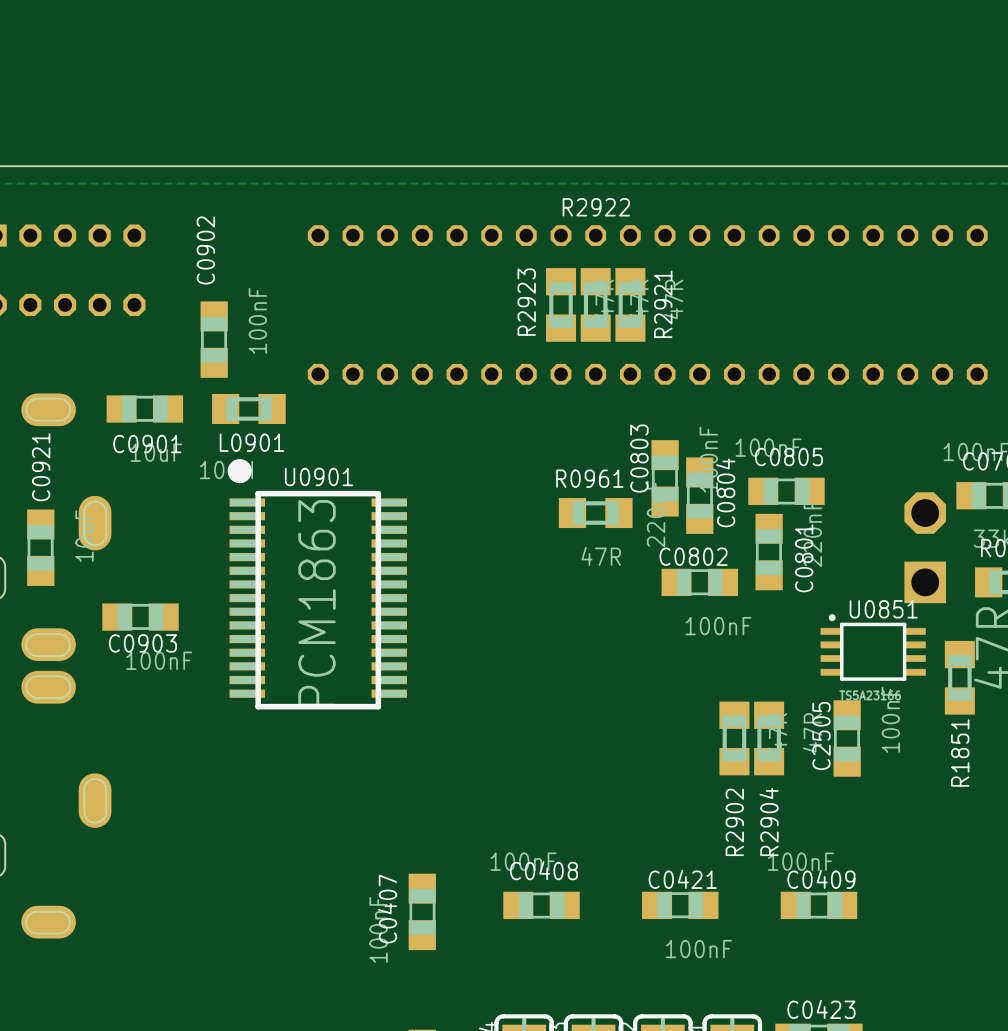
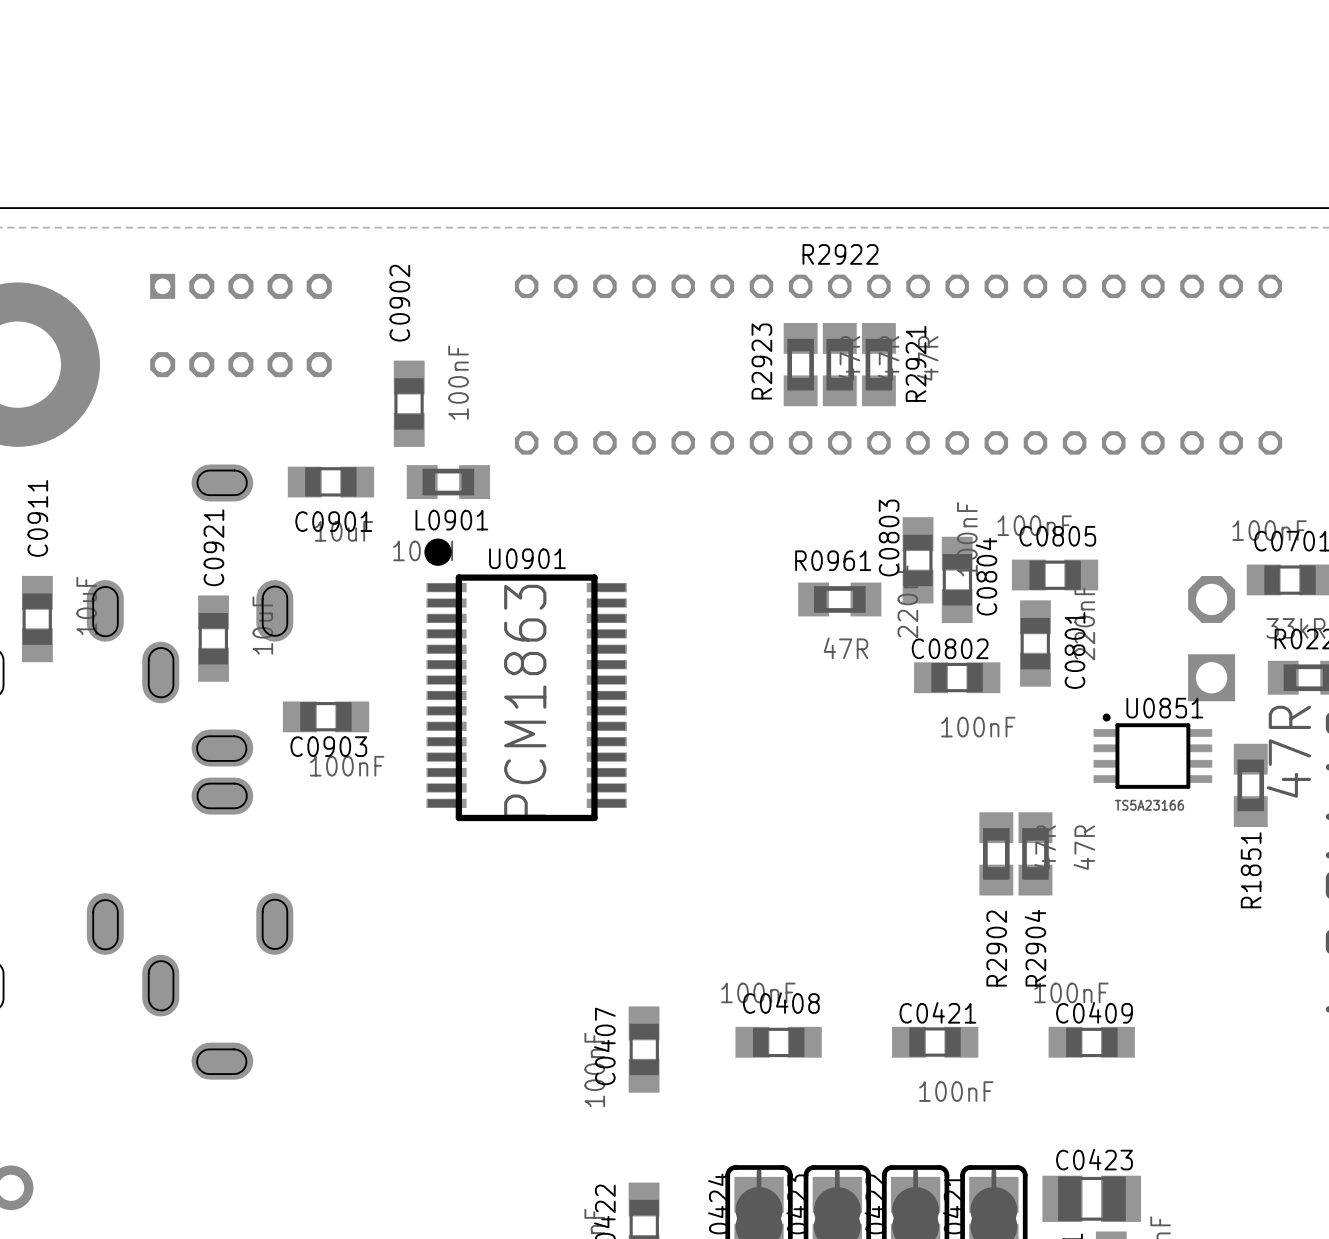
C2505: 100nF (847, 738) -> none

